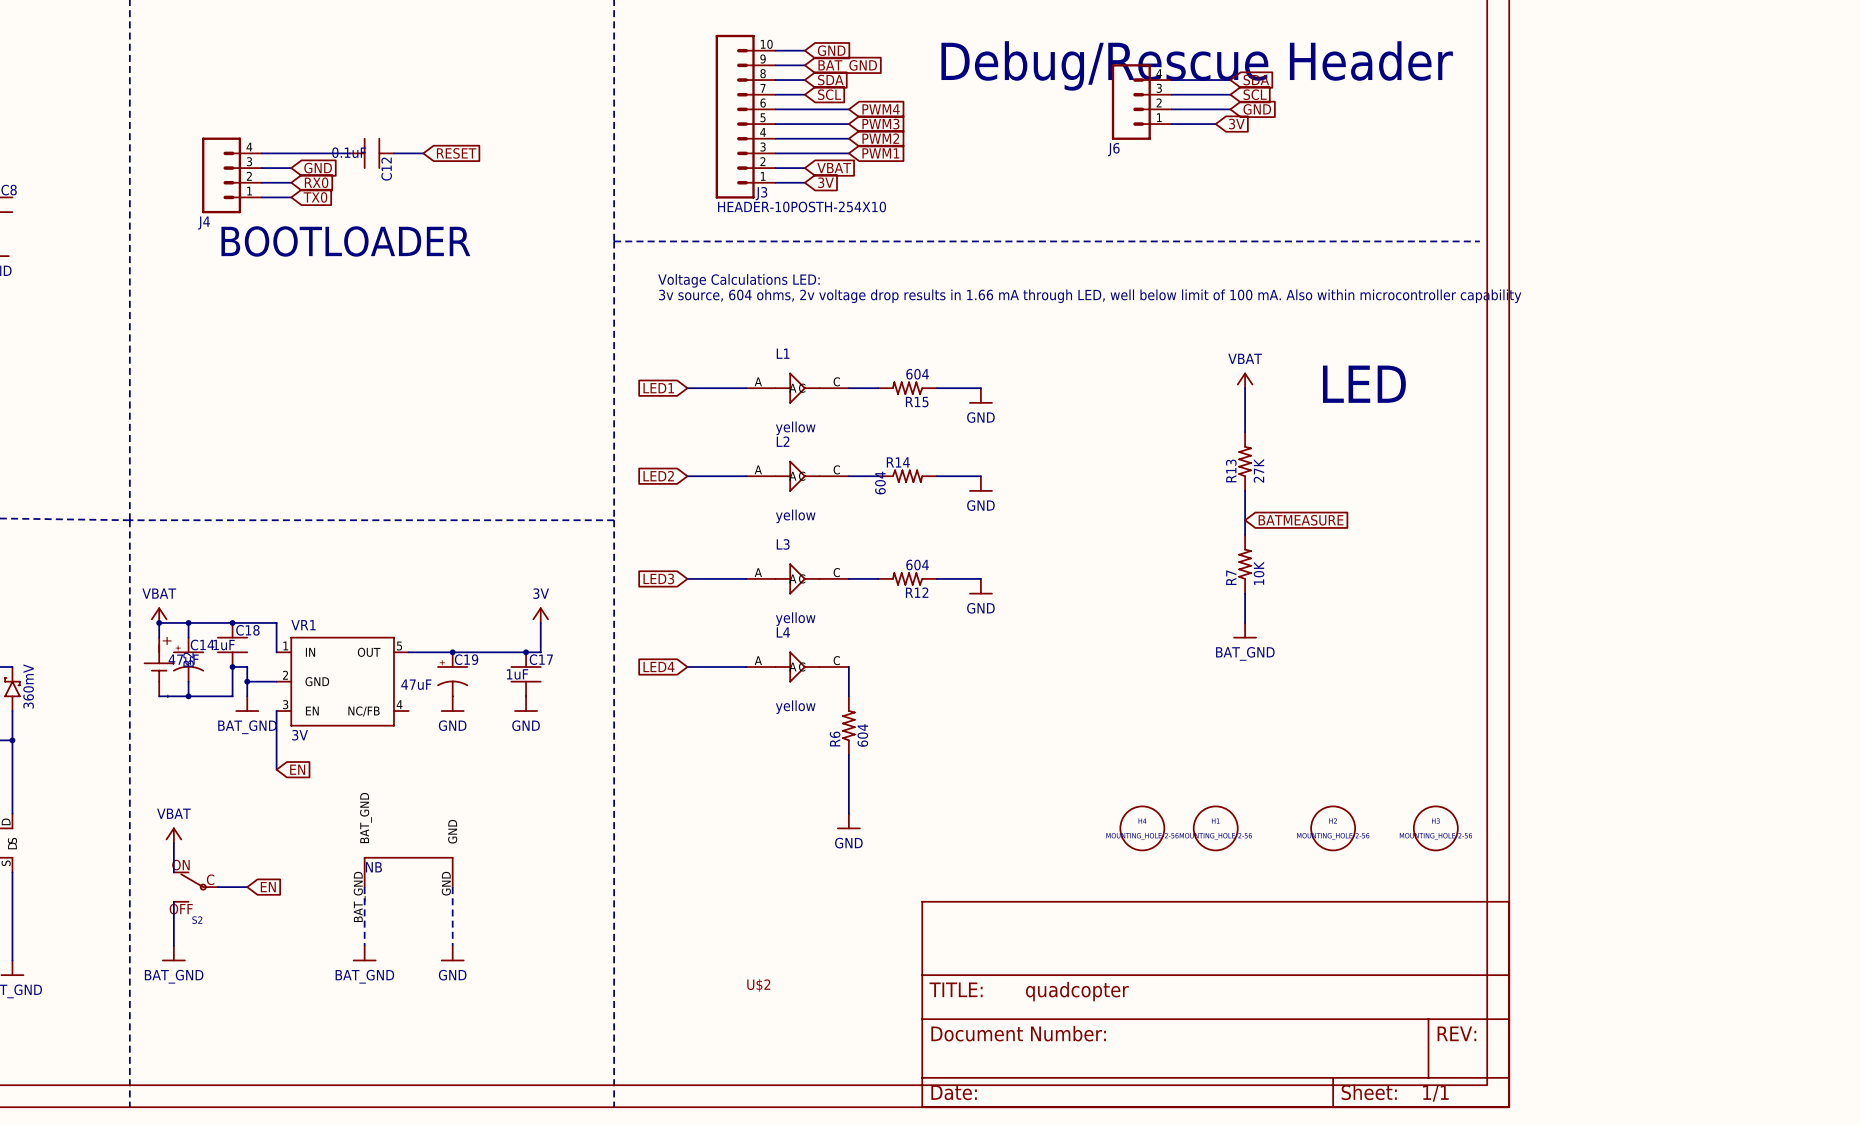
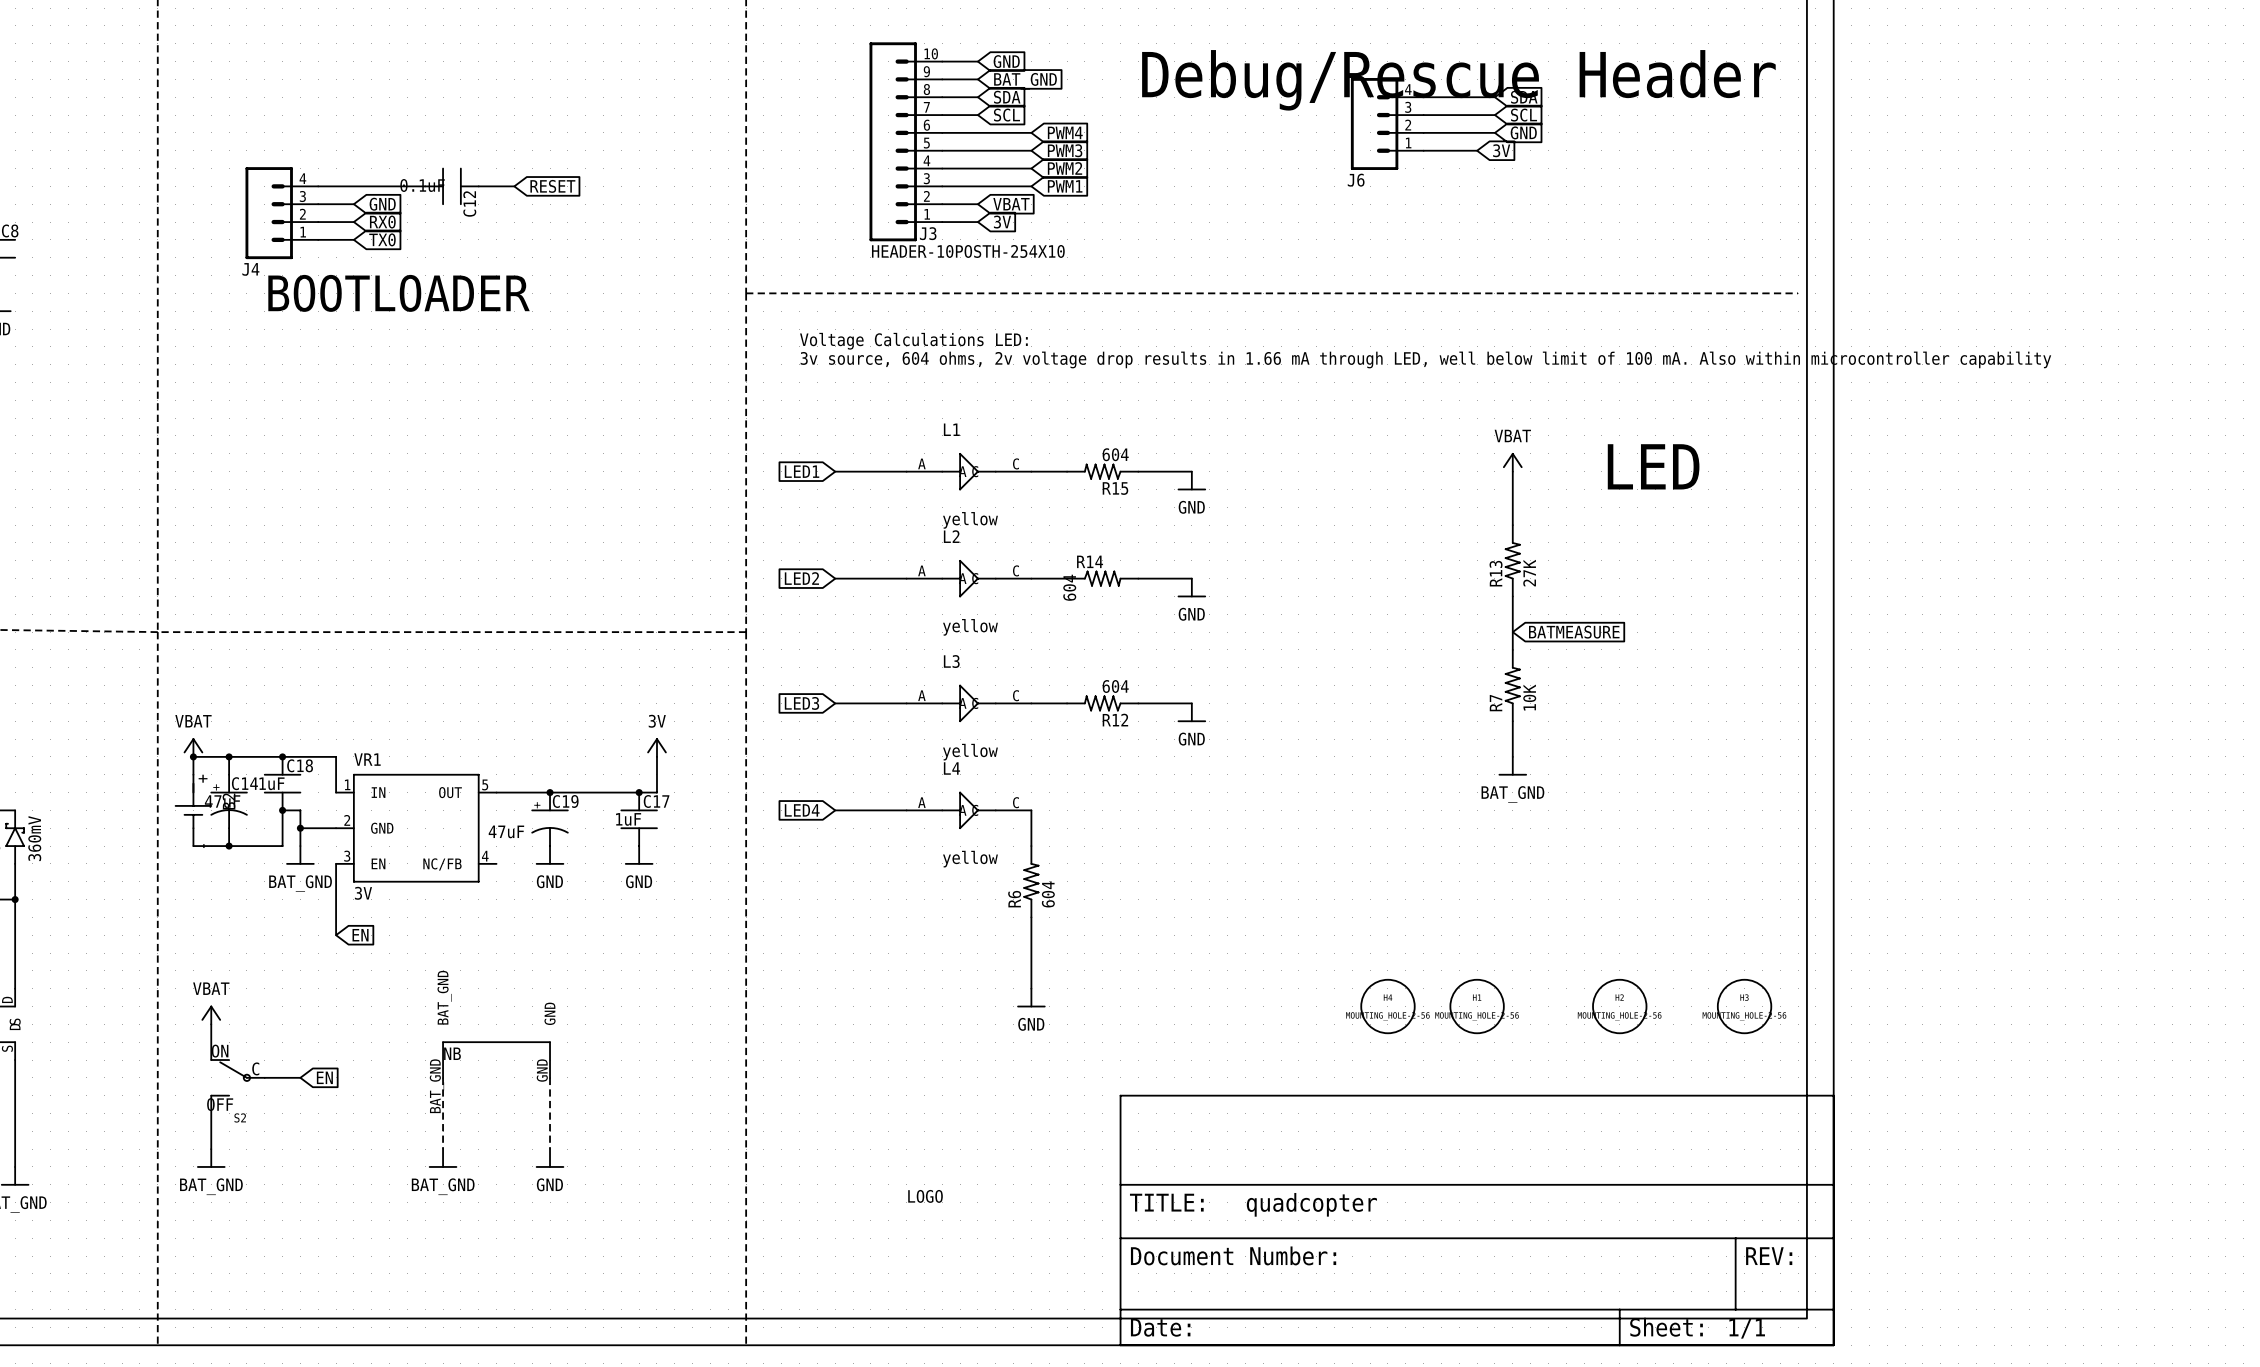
LOGO: none -> (925, 1196)
U$2: (758, 985) -> none

